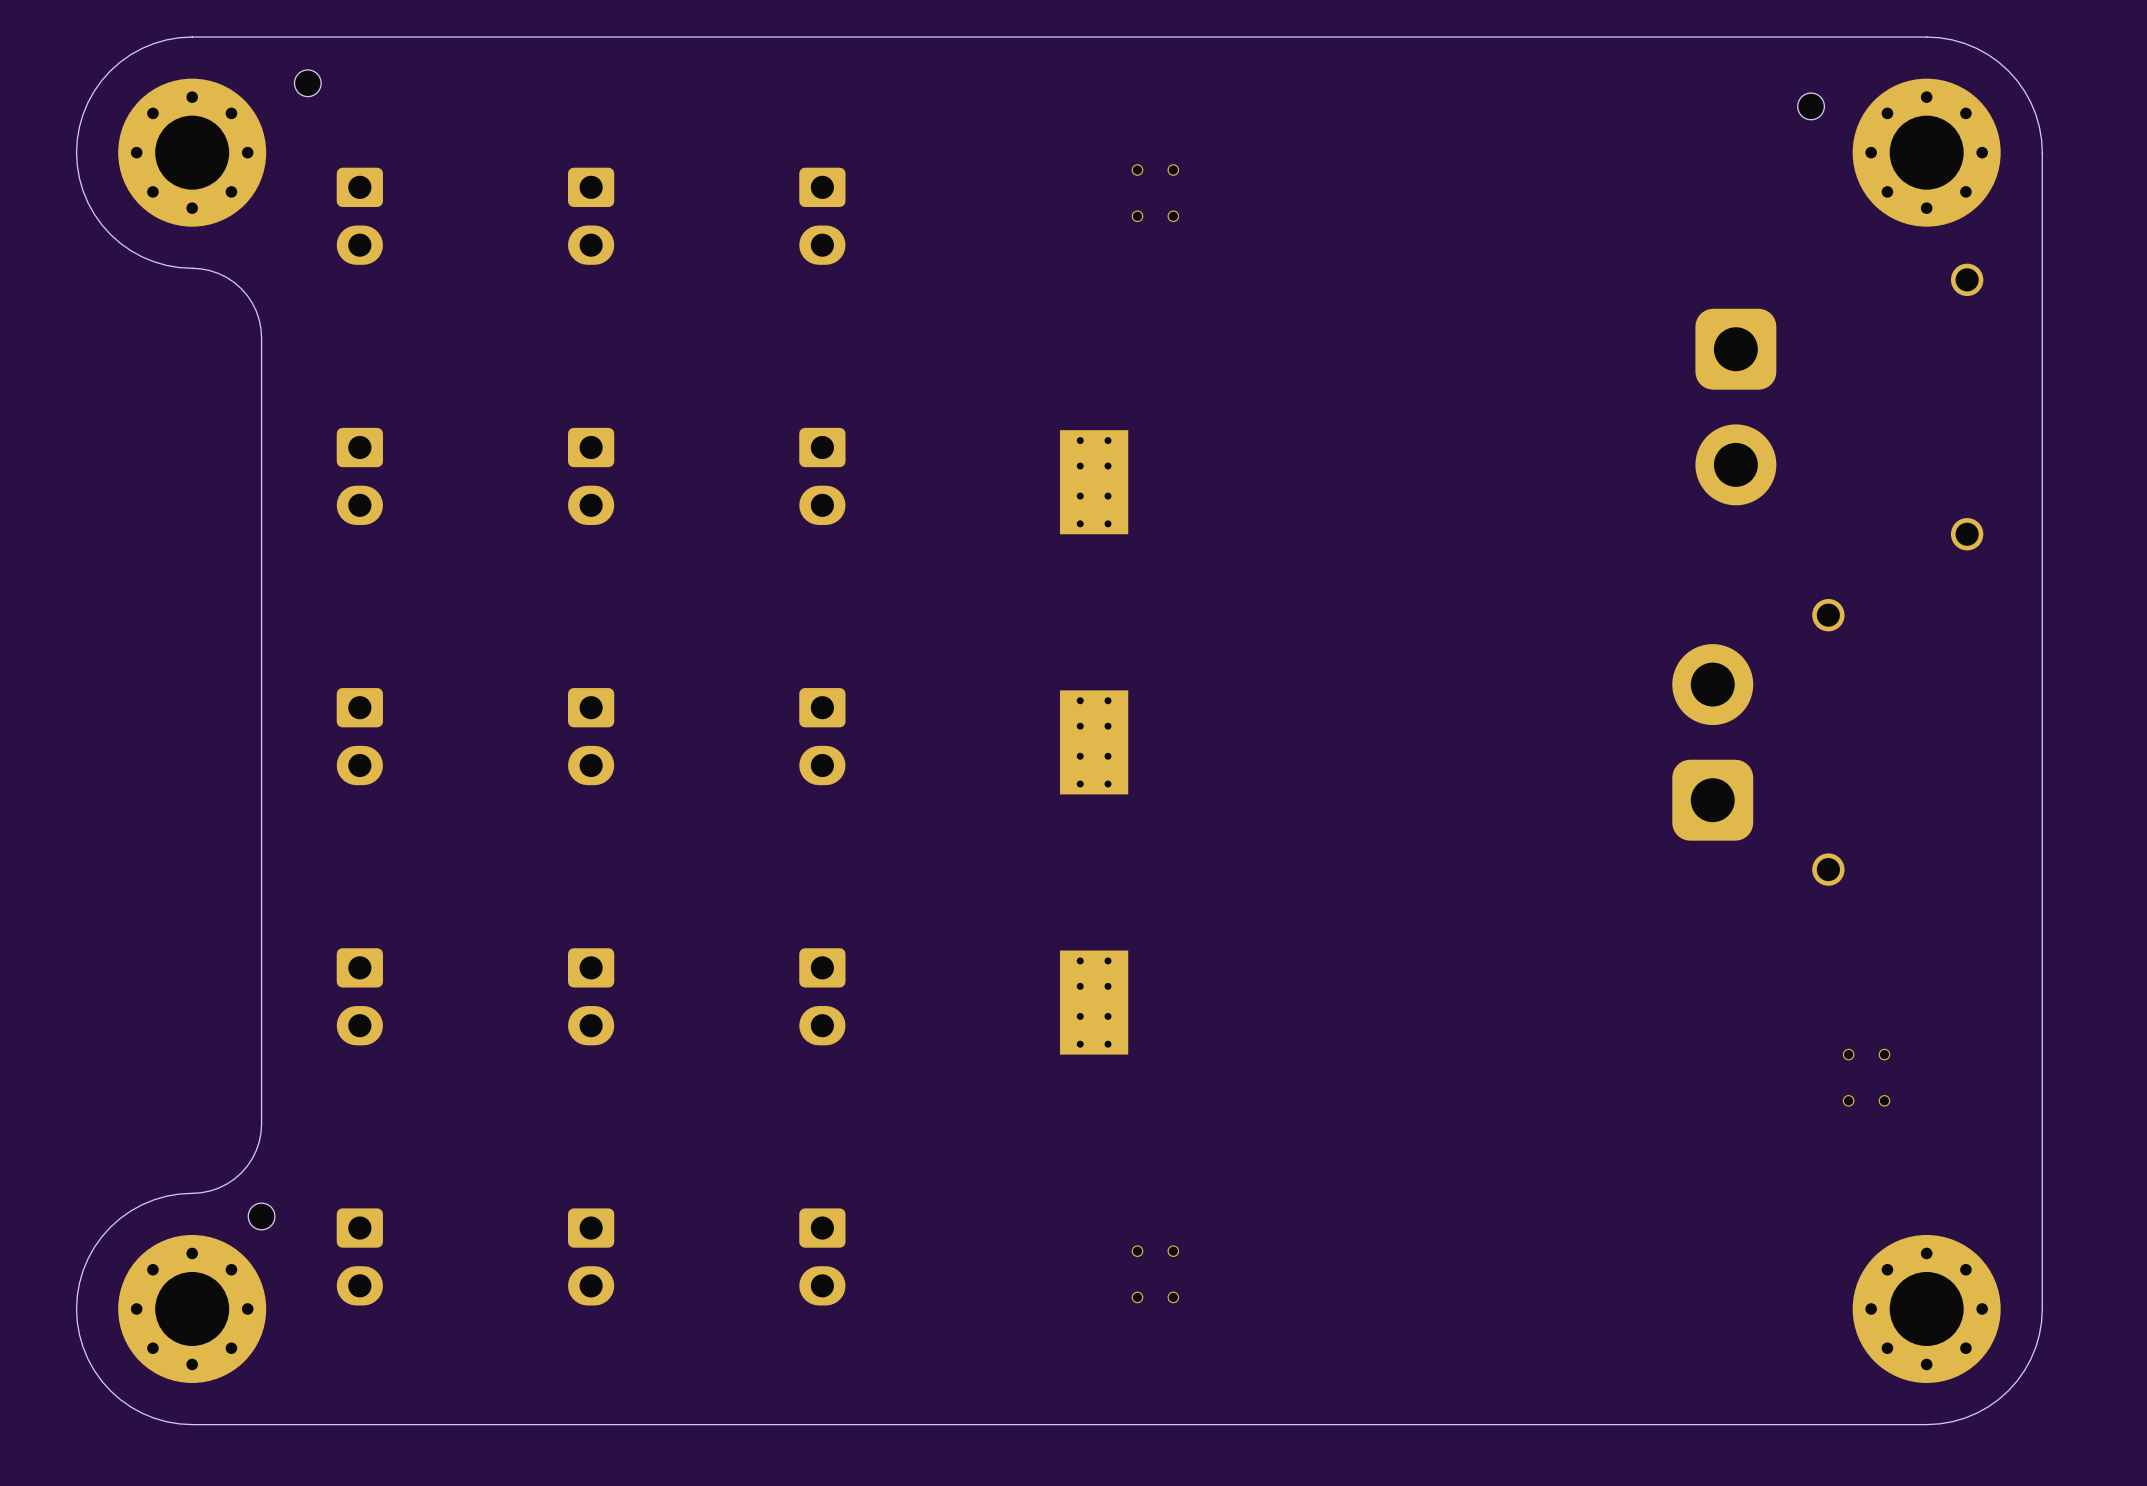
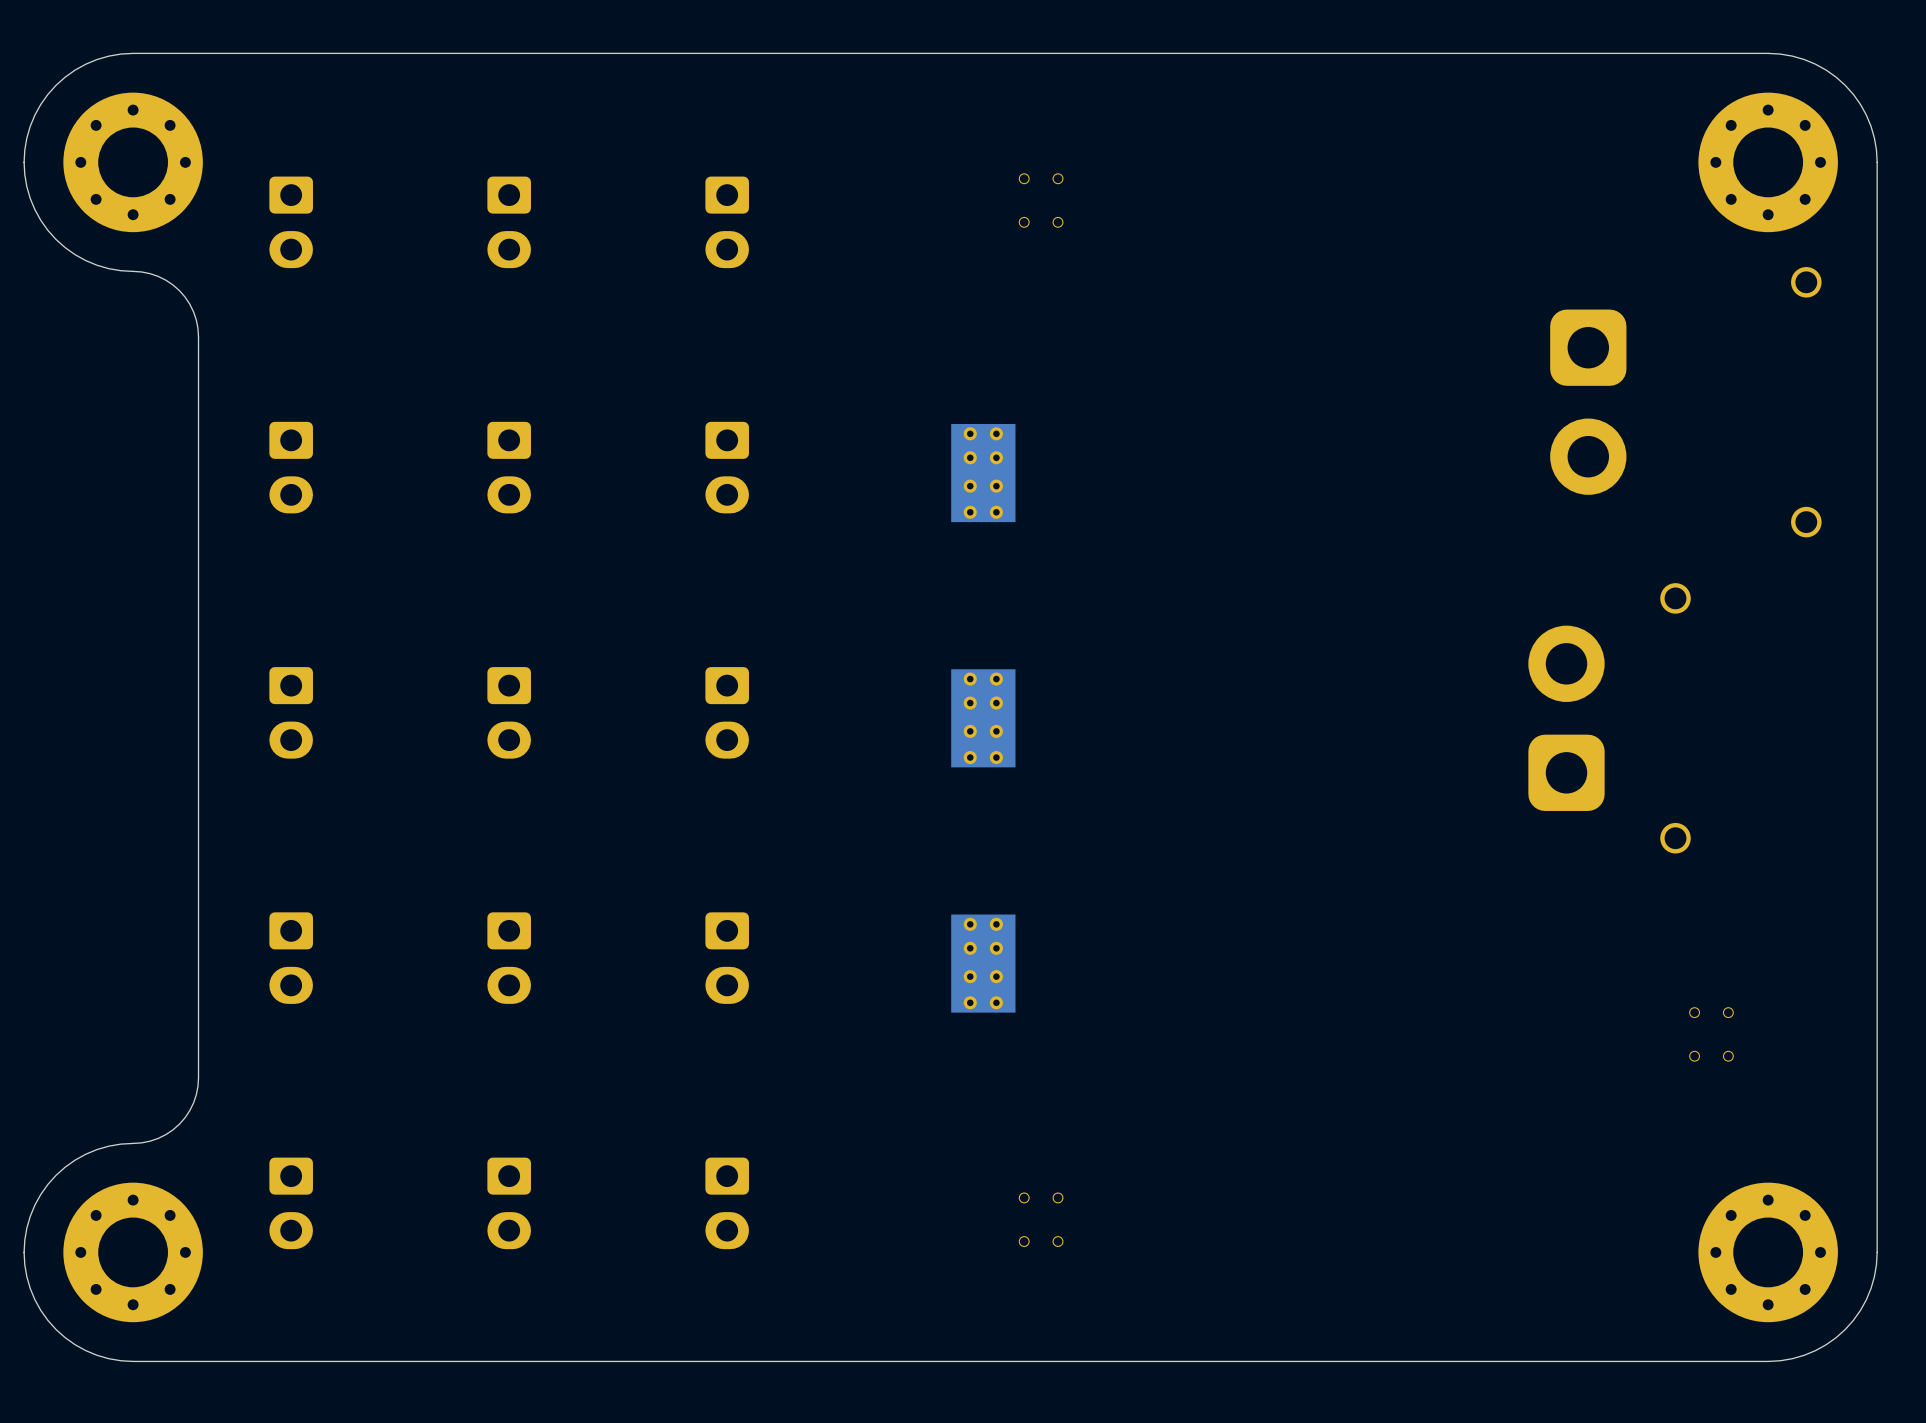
part: (307, 83) -> none
part: (1811, 106) -> none
part: (261, 1216) -> none

